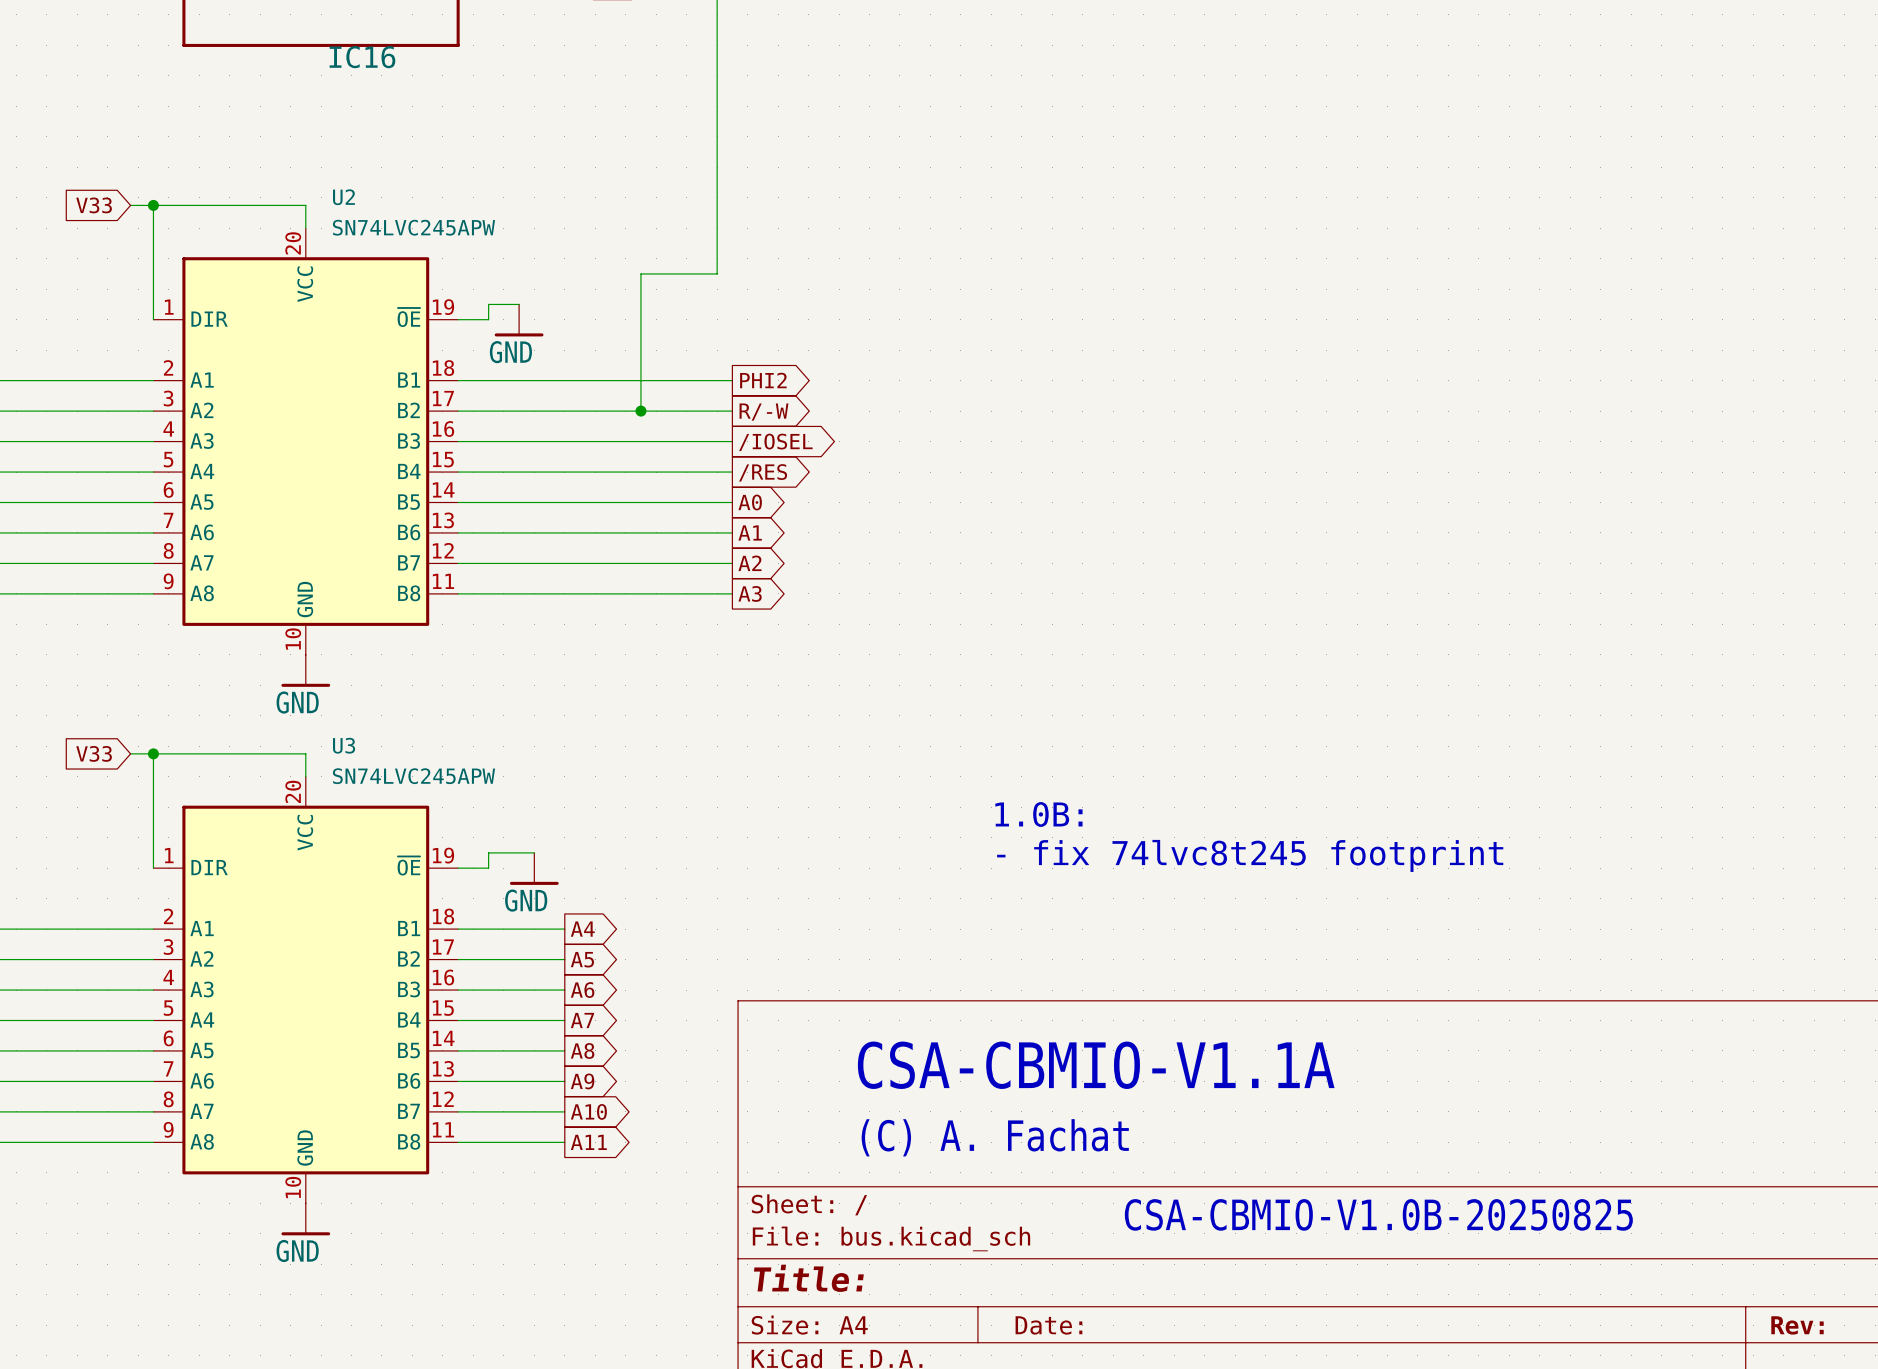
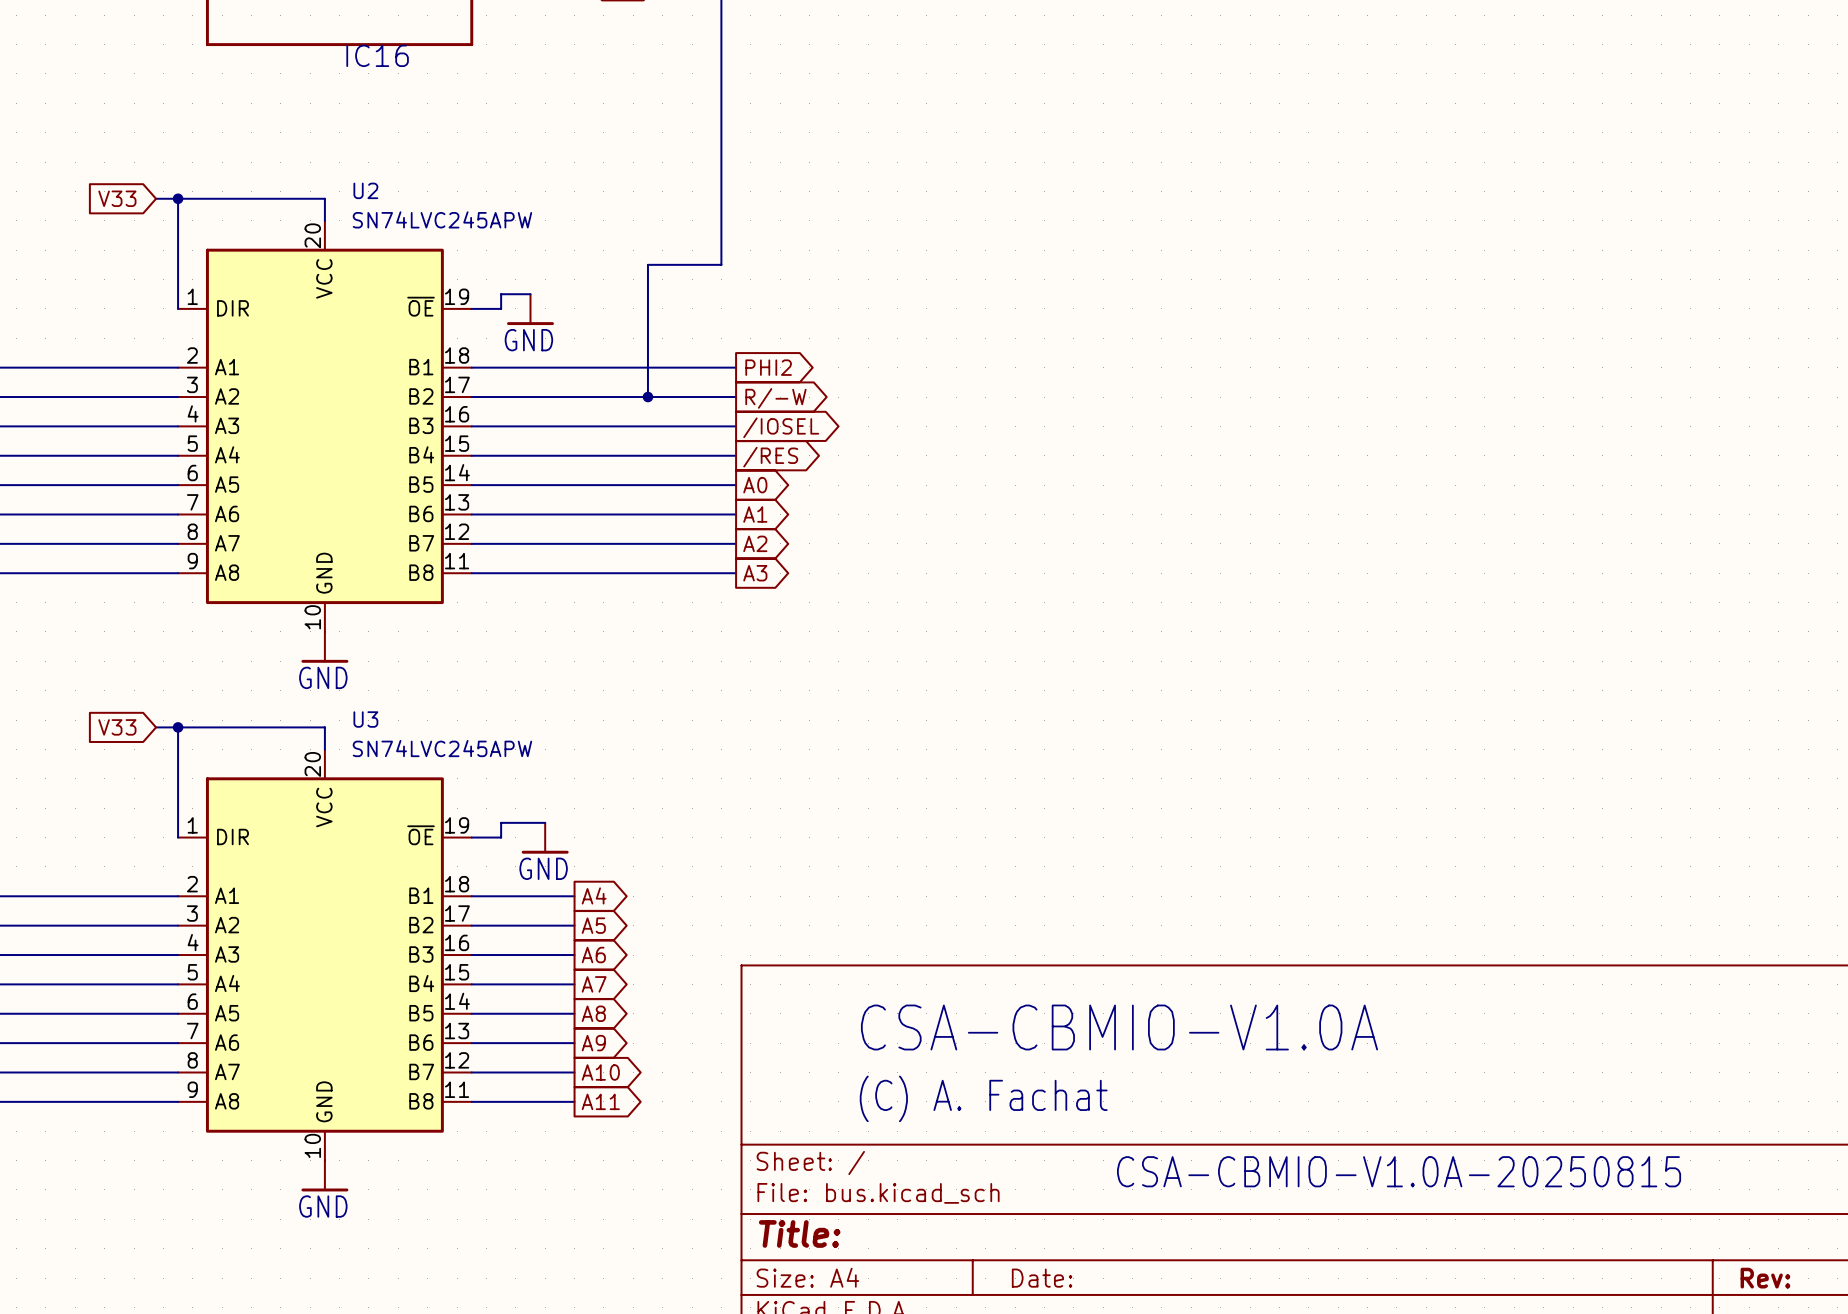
text: 1.0B: (1038, 814) -> none
text: - fix 74lvc8t245 footprint (1250, 855) -> none
text: CSA-CBMIO-V1.1A (1096, 1065) -> CSA-CBMIO-V1.0A (1119, 1027)
text: CSA-CBMIO-V1.0B-20250825 (1378, 1214) -> CSA-CBMIO-V1.0A-20250815 (1399, 1171)

